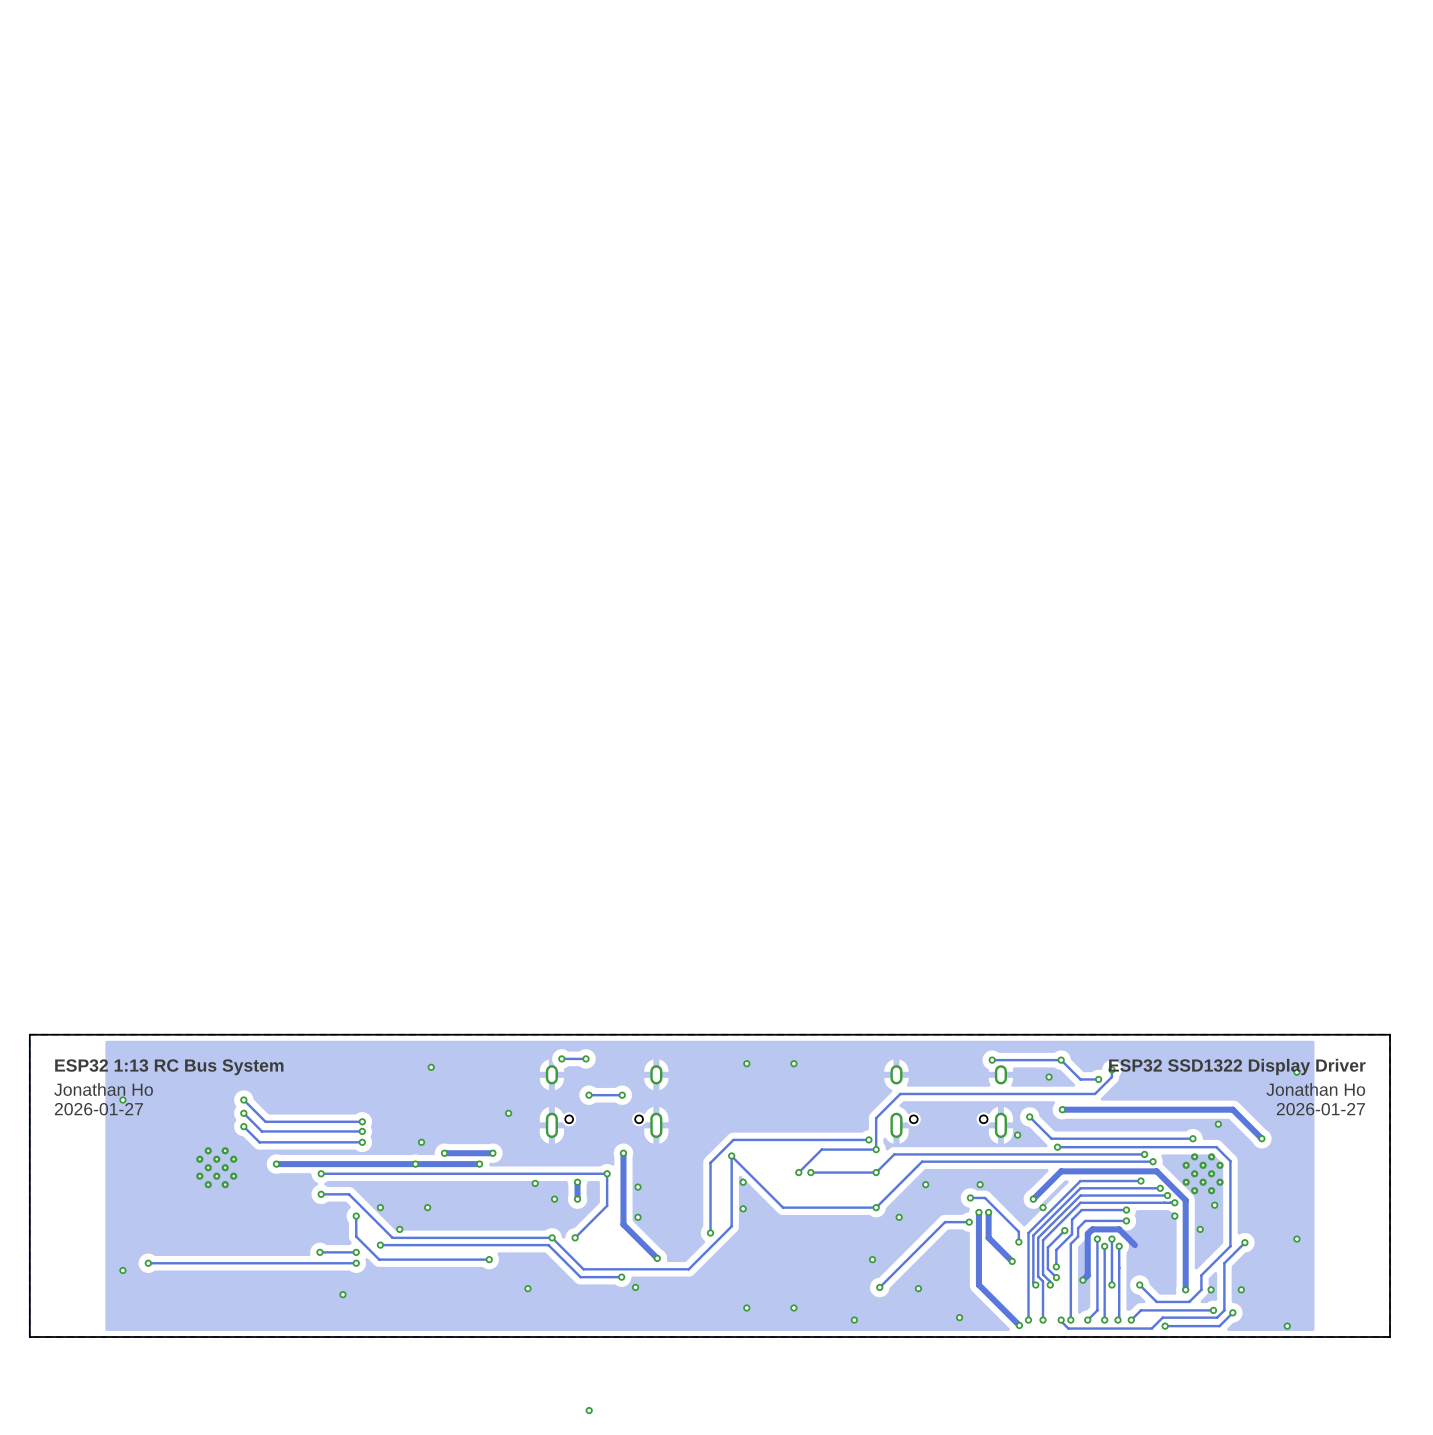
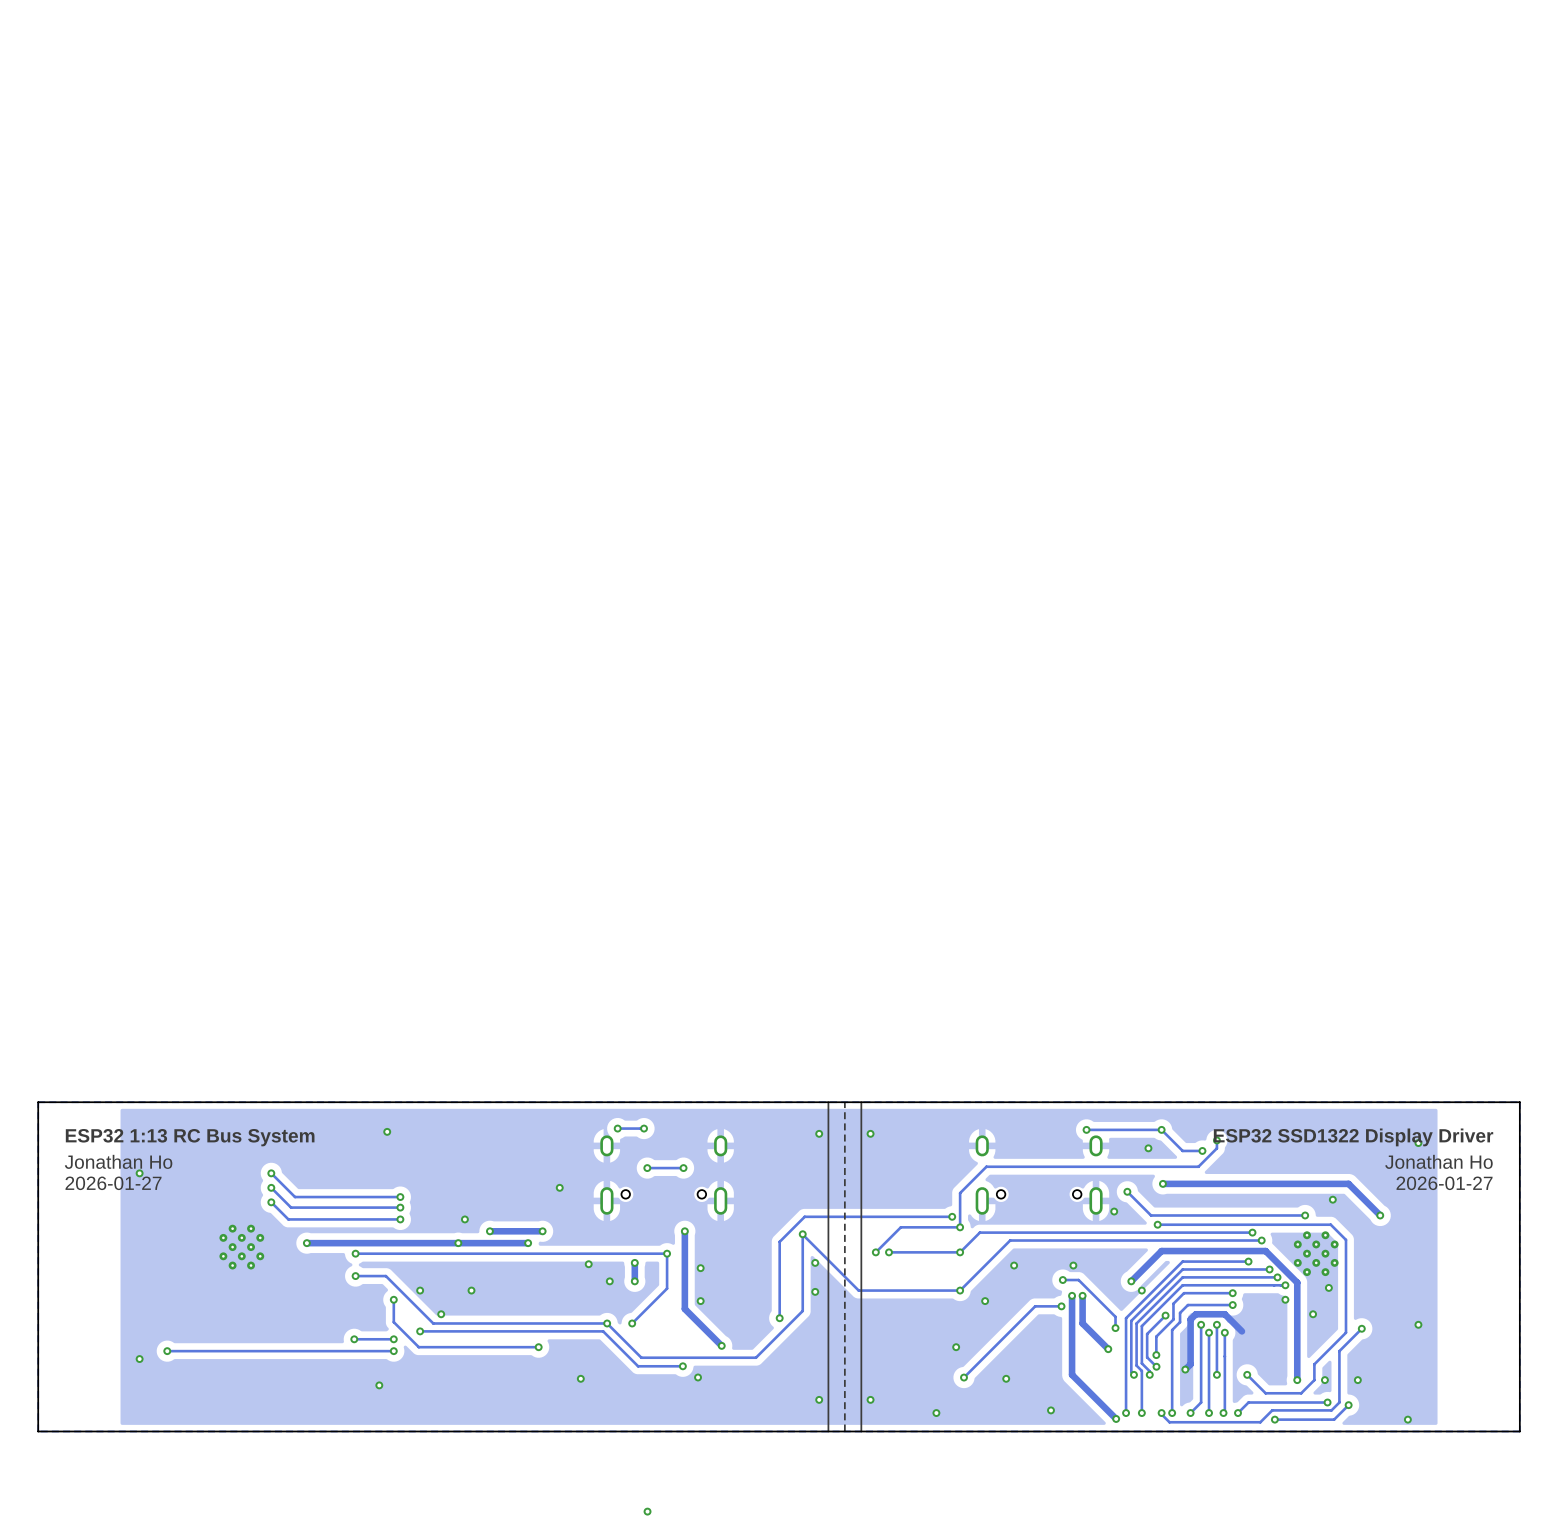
line: none -> (828, 1102) (828, 1431)
line: none -> (844, 1102) (844, 1431)
line: none -> (861, 1102) (861, 1431)
via: none -> (387, 1131)
via: (431, 1067) -> none

